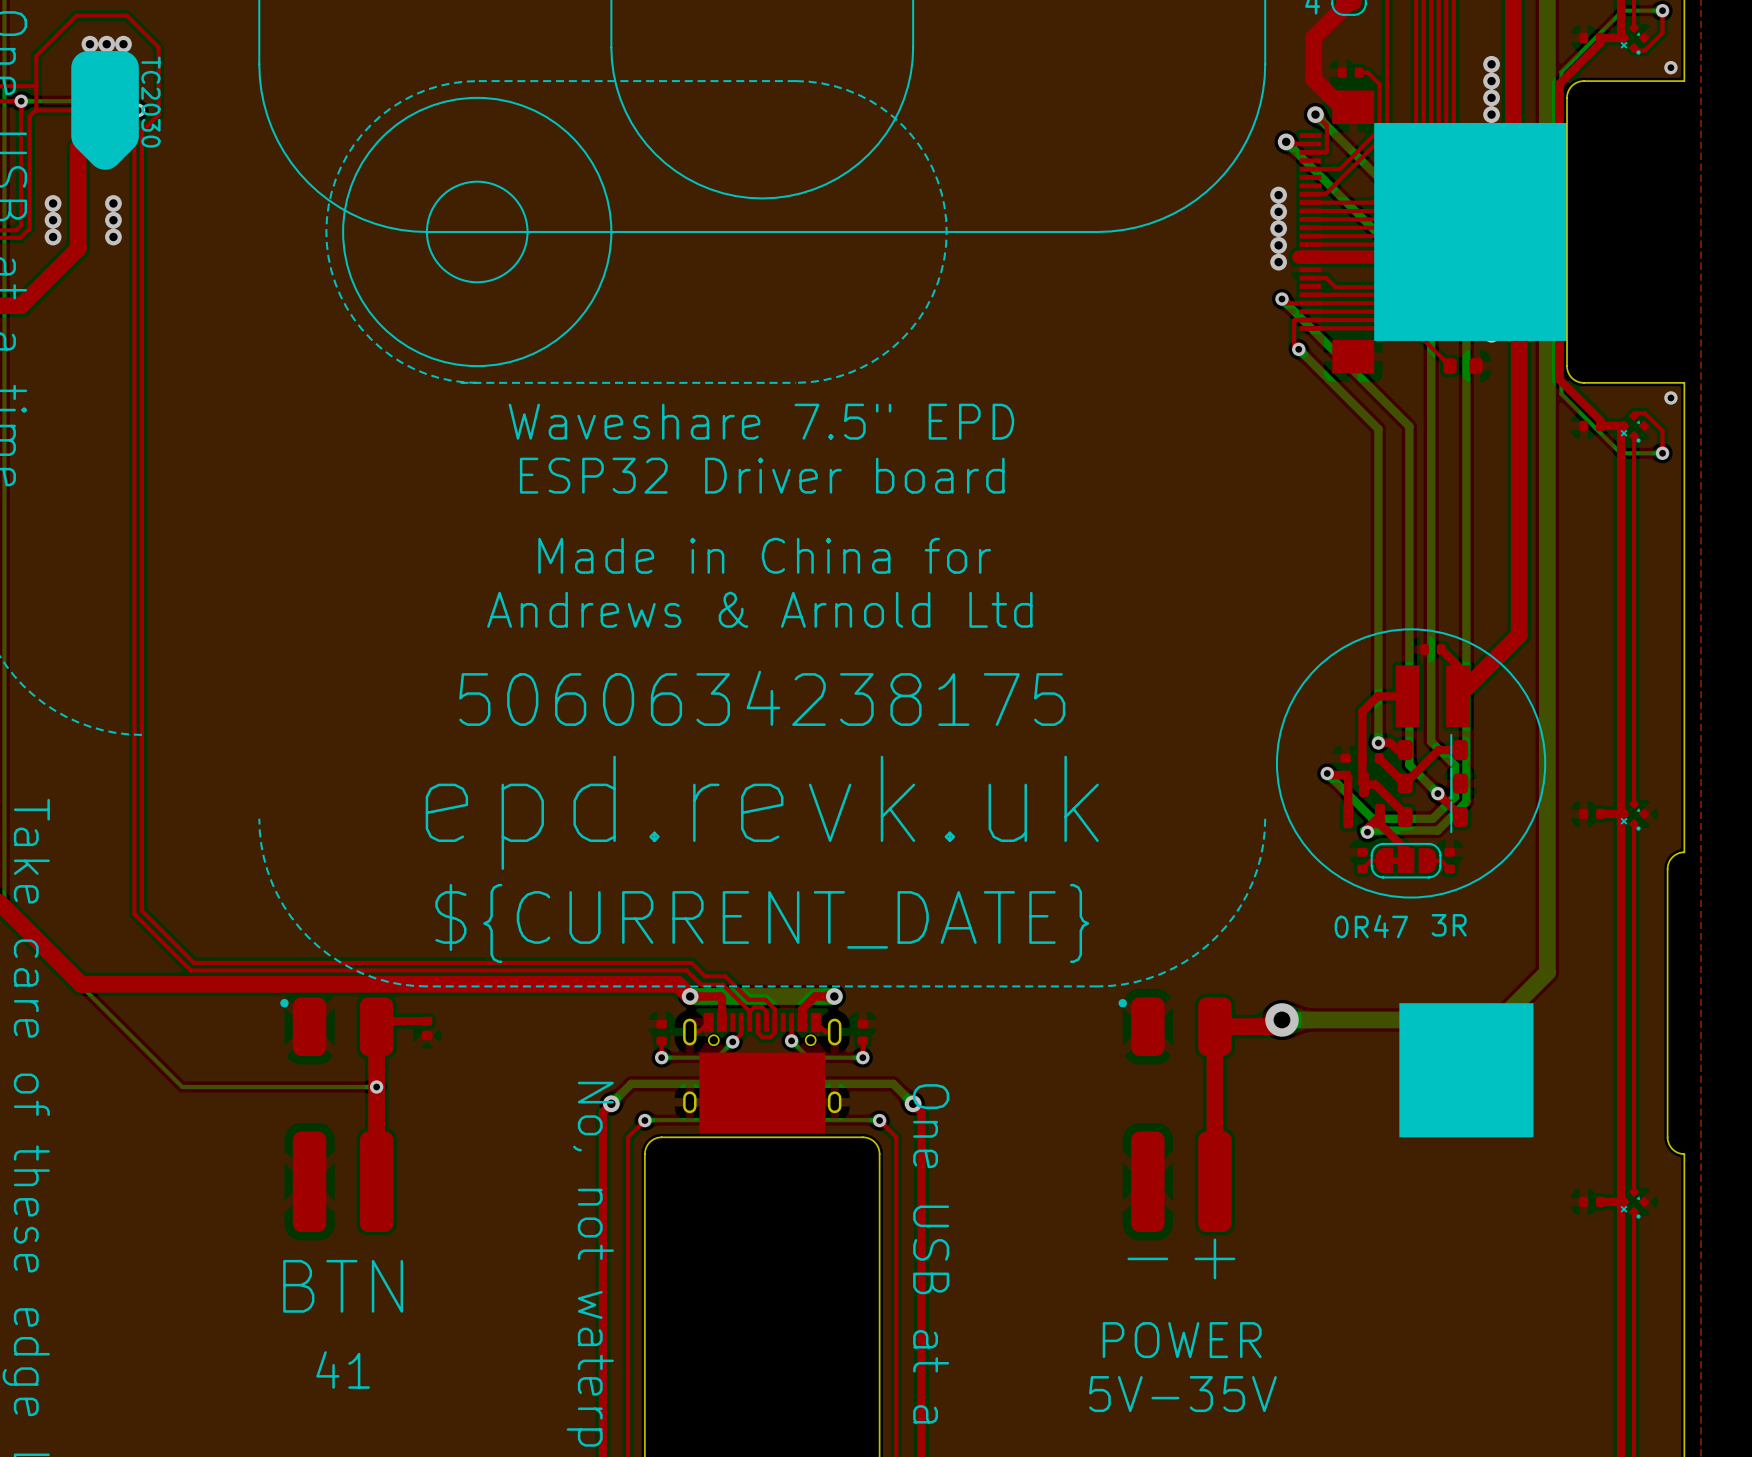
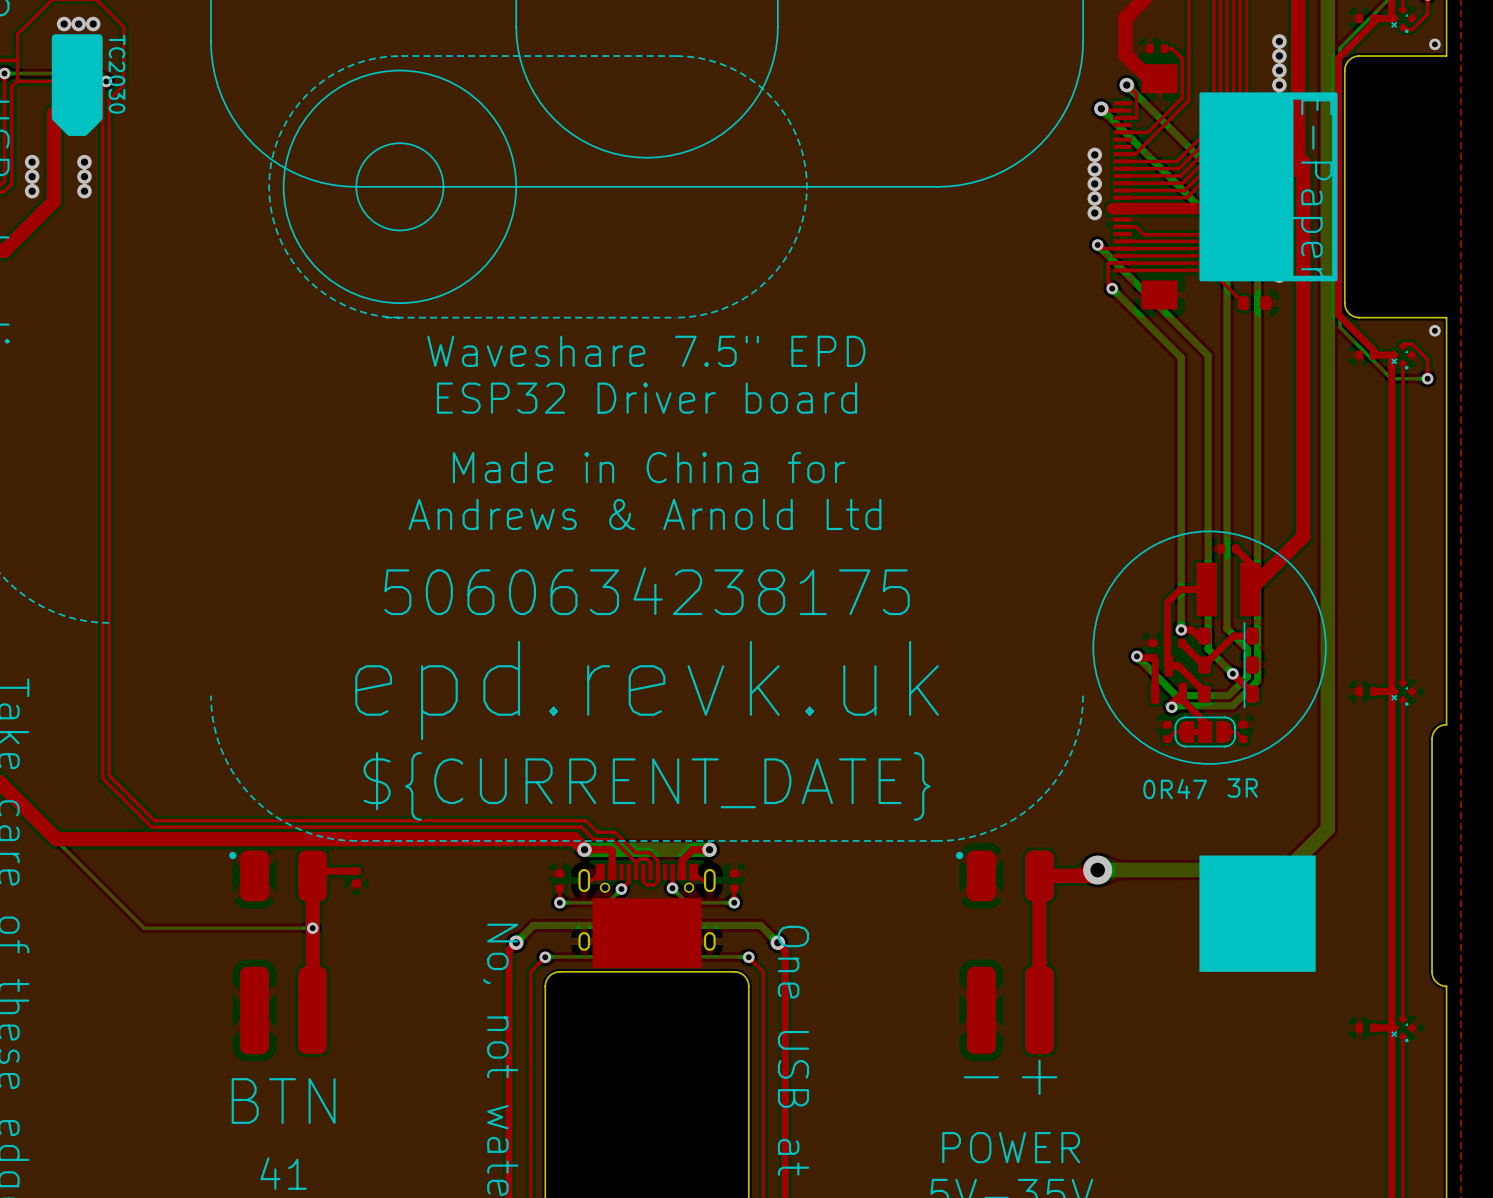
part footprint: [71, 51, 139, 170] -> [51, 34, 103, 136]
drawing shape: [1374, 123, 1568, 341] -> [1199, 92, 1338, 282]
text: none -> E-Paper (1311, 188)

